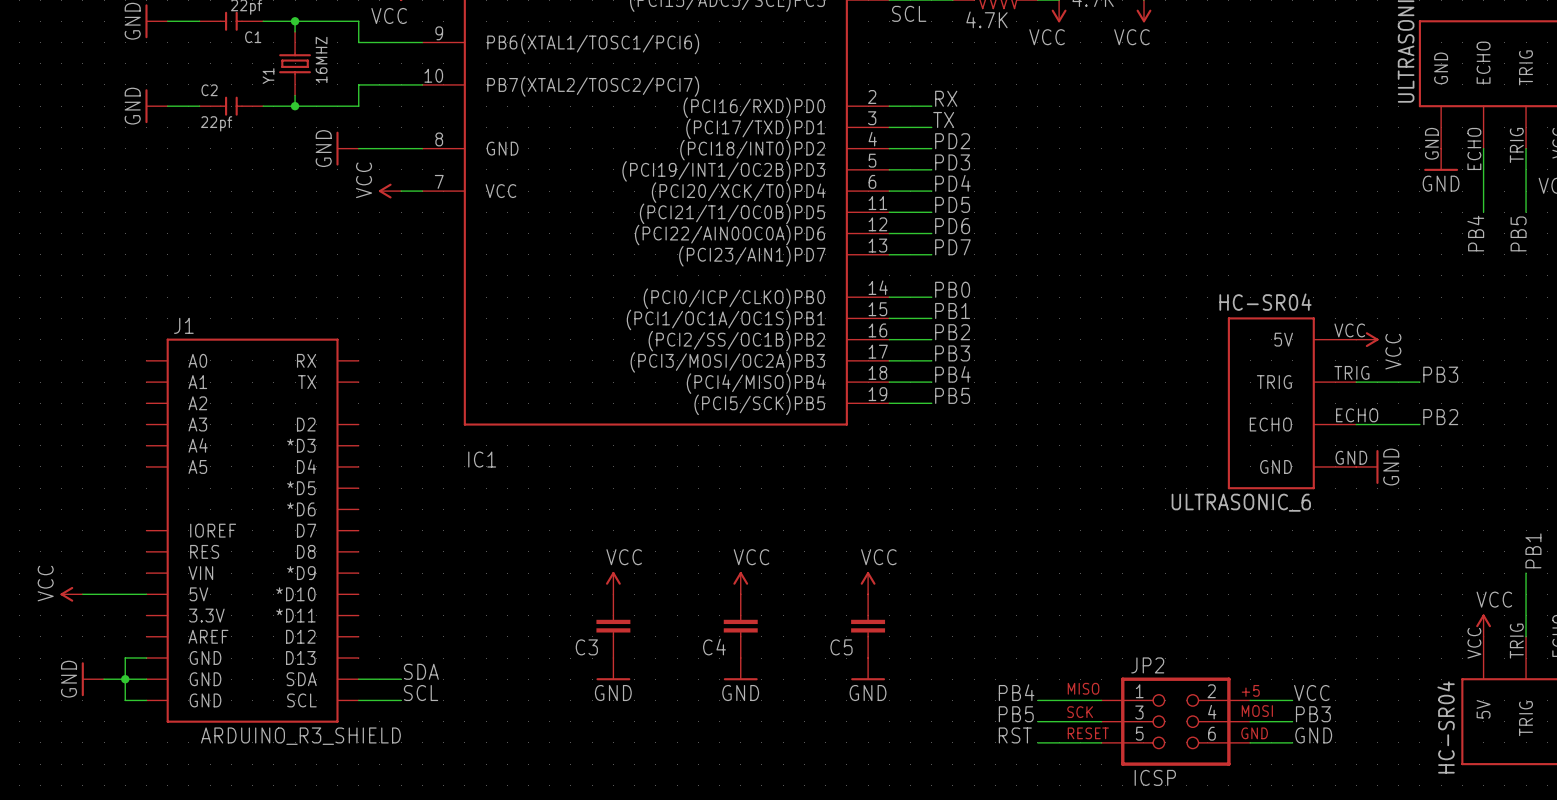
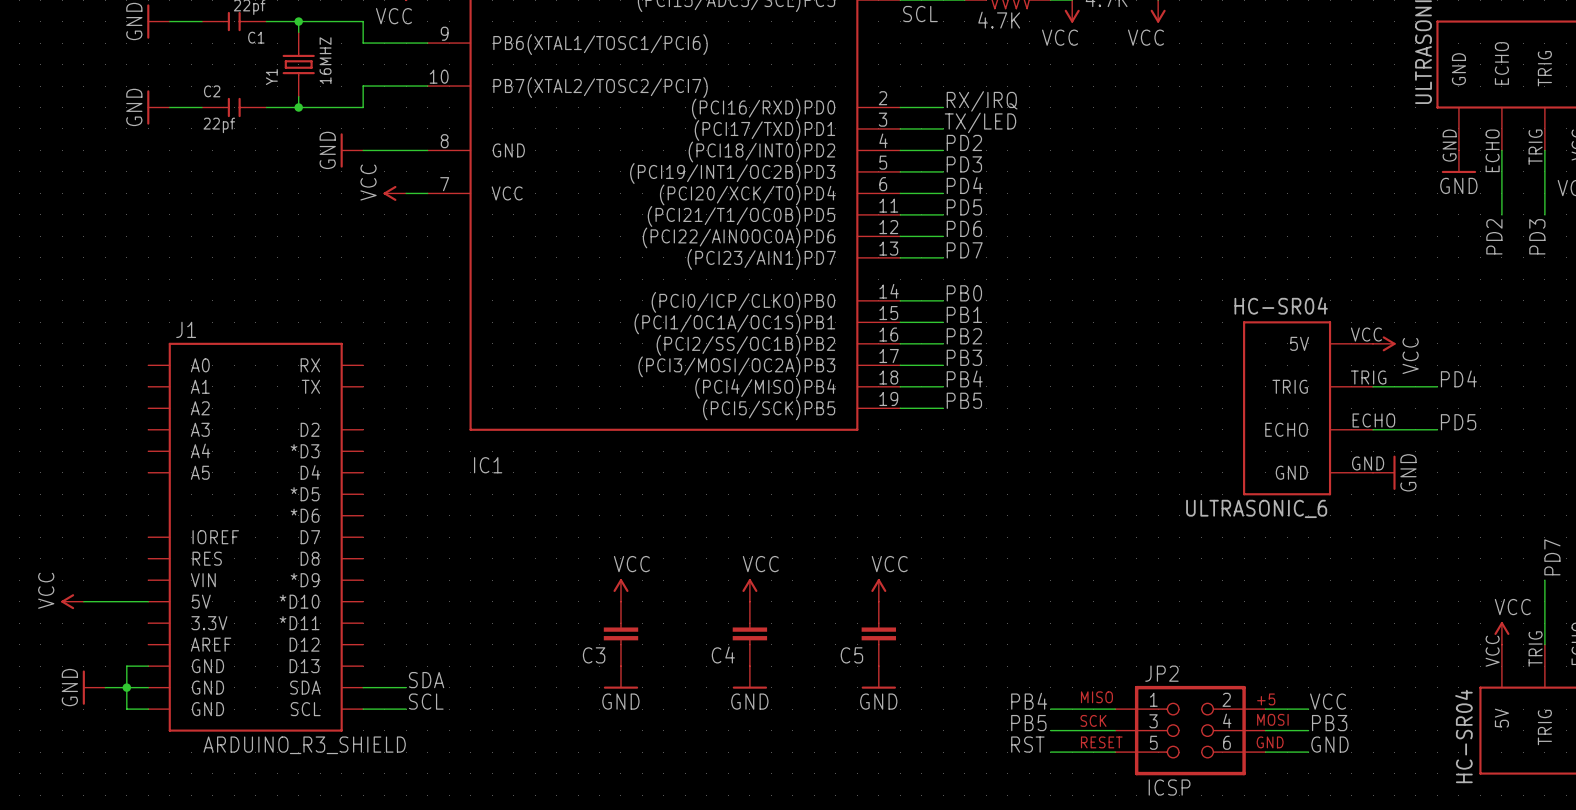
label: RX (946, 98) -> RX/IRQ (982, 101)
label: TX (943, 119) -> TX/LED (980, 122)
label: PB4 (1475, 233) -> PD2 (1494, 236)
label: PB5 (1518, 233) -> PD3 (1537, 236)
label: PB3 (1440, 374) -> PD4 (1458, 378)
label: PB2 (1440, 417) -> PD5 (1458, 422)
label: PB1 (1533, 550) -> PD7 (1552, 557)

